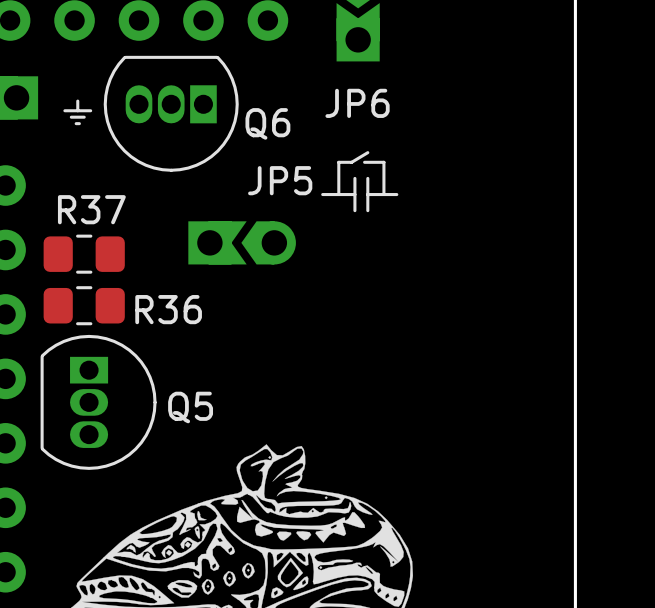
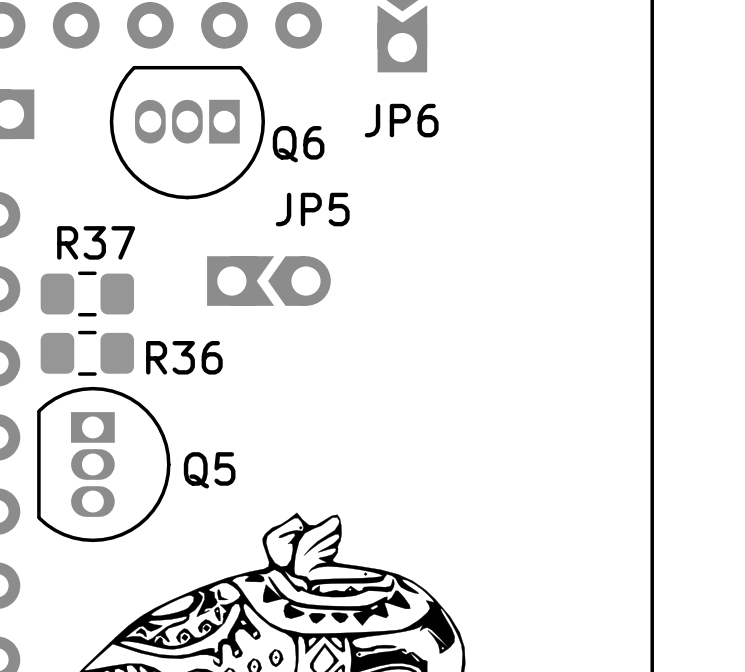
line: (77, 101) (77, 110) -> none
line: (64, 110) (90, 110) -> none
line: (71, 117) (84, 117) -> none
line: (76, 123) (79, 123) -> none
line: (367, 152) (351, 162) (338, 162) (338, 194) -> none
line: (364, 162) (383, 162) (383, 194) -> none
line: (354, 178) (354, 210) -> none
line: (367, 178) (367, 210) -> none
line: (322, 194) (354, 194) -> none
line: (367, 194) (396, 194) -> none

